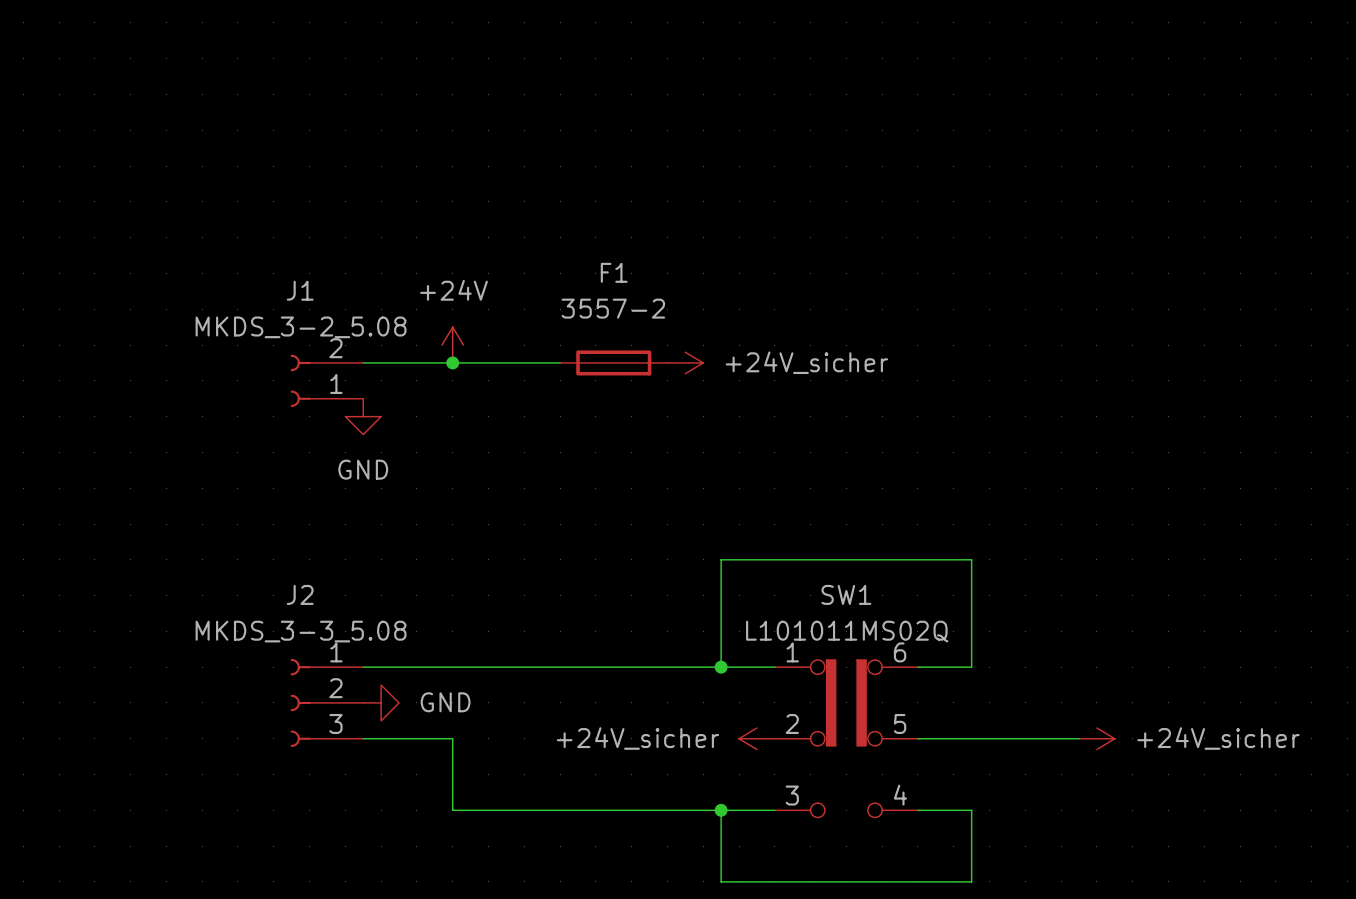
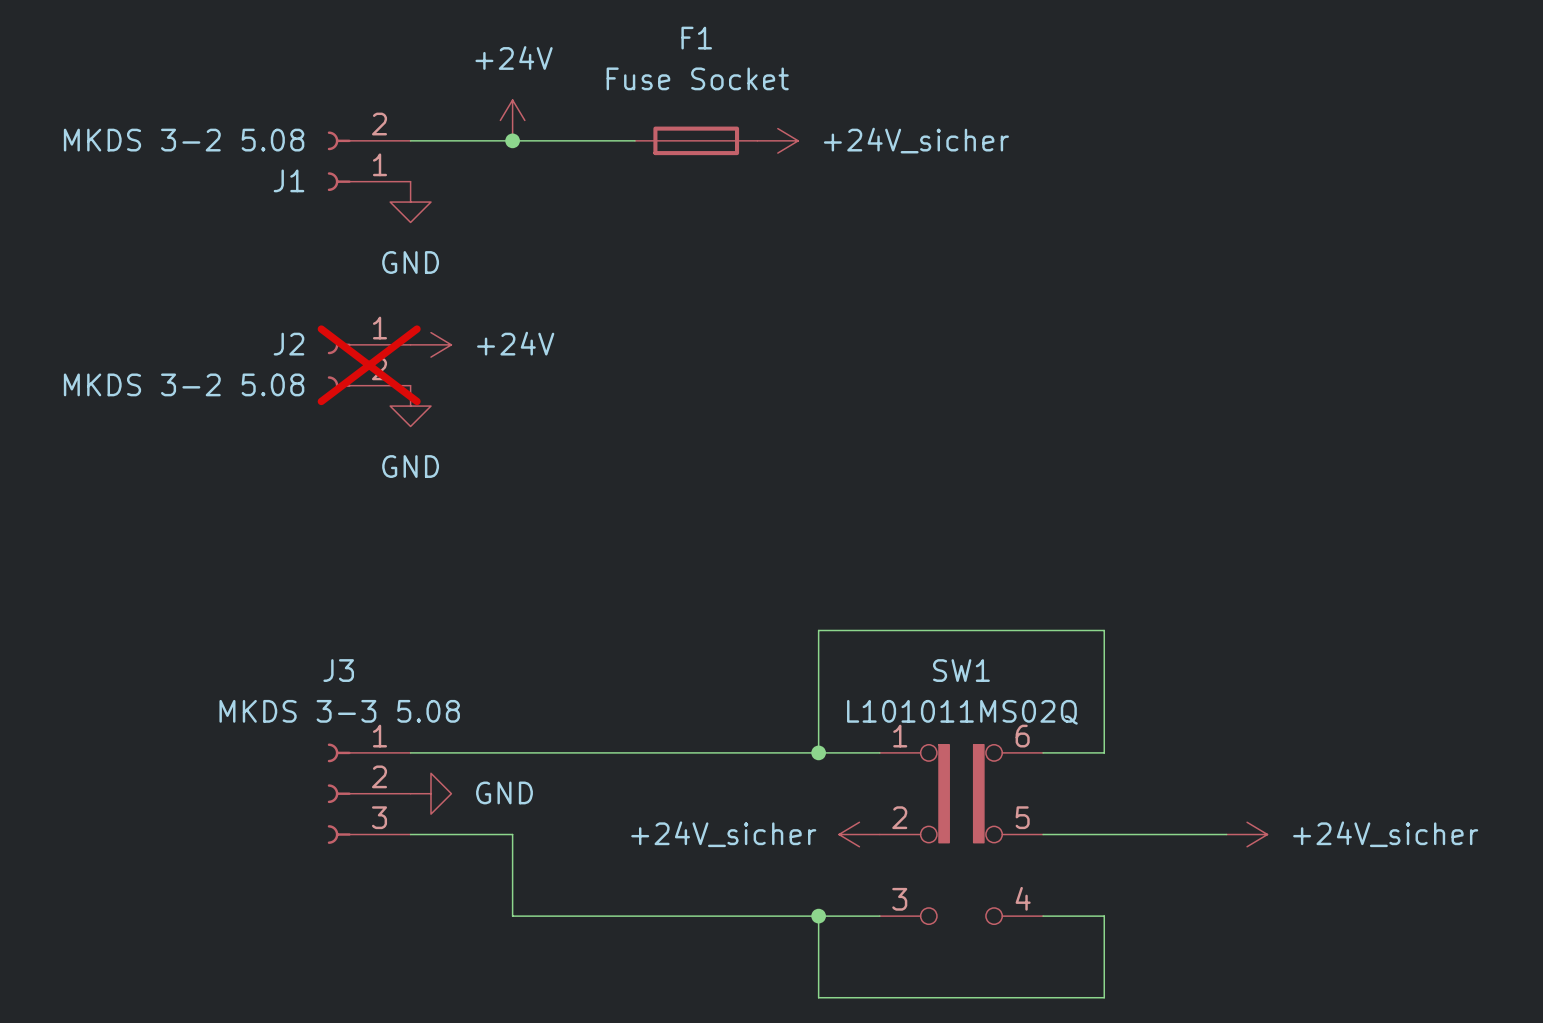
power symbol: none -> +24V (512, 120)
junction: none -> (512, 140)
power symbol: none -> GND (410, 202)
J1 name position: J1 (300, 290) -> J1 (289, 180)
F1 value: 3557-2 (613, 308) -> Fuse Socket (697, 78)
J1 value: MKDS_3-2_5.08 (301, 327) -> MKDS 3-2 5.08 (184, 140)
J2: none -> MKDS 3-2 5.08 (369, 365)
power symbol rotation: 0° (452, 345) -> 90° clockwise (430, 344)
power symbol position: +24V (452, 345) -> +24V (430, 344)
wire: (363, 362) (560, 362) -> (410, 140) (635, 140)
junction: (452, 362) -> none
F1 position: (613, 362) -> (696, 140)
power symbol position: +24V_sicher (685, 362) -> +24V_sicher (777, 140)
J1 position: (326, 380) -> (369, 161)
power symbol position: GND (363, 416) -> GND (410, 406)
J2 name: J2 (300, 594) -> J3 (338, 670)
J2 value: MKDS_3-3_5.08 (301, 631) -> MKDS 3-3 5.08 (339, 711)

